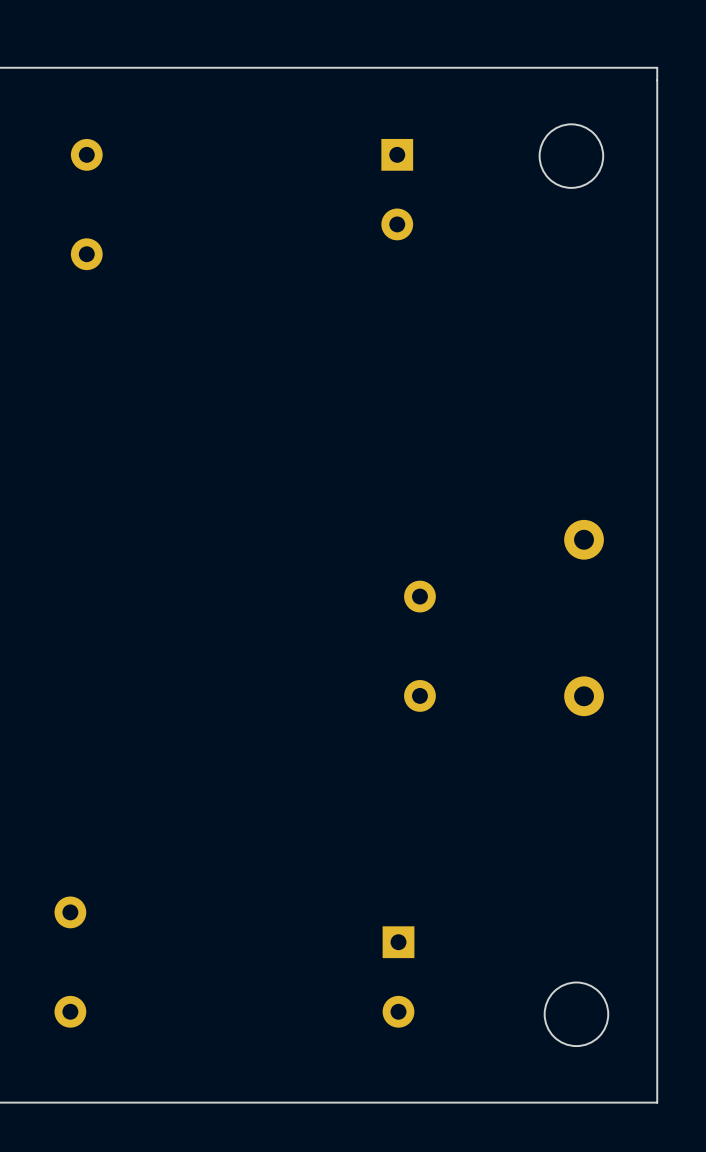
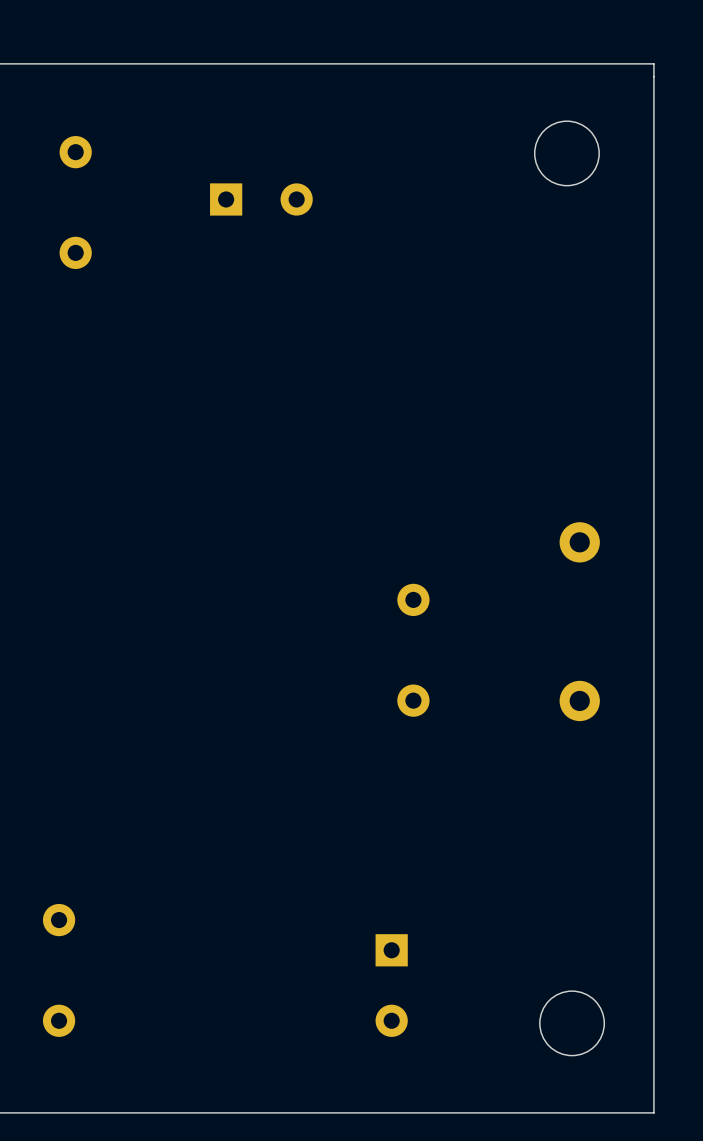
part rotation: 0° (397, 189) -> 90° counterclockwise (261, 199)
part position: (397, 189) -> (261, 199)

